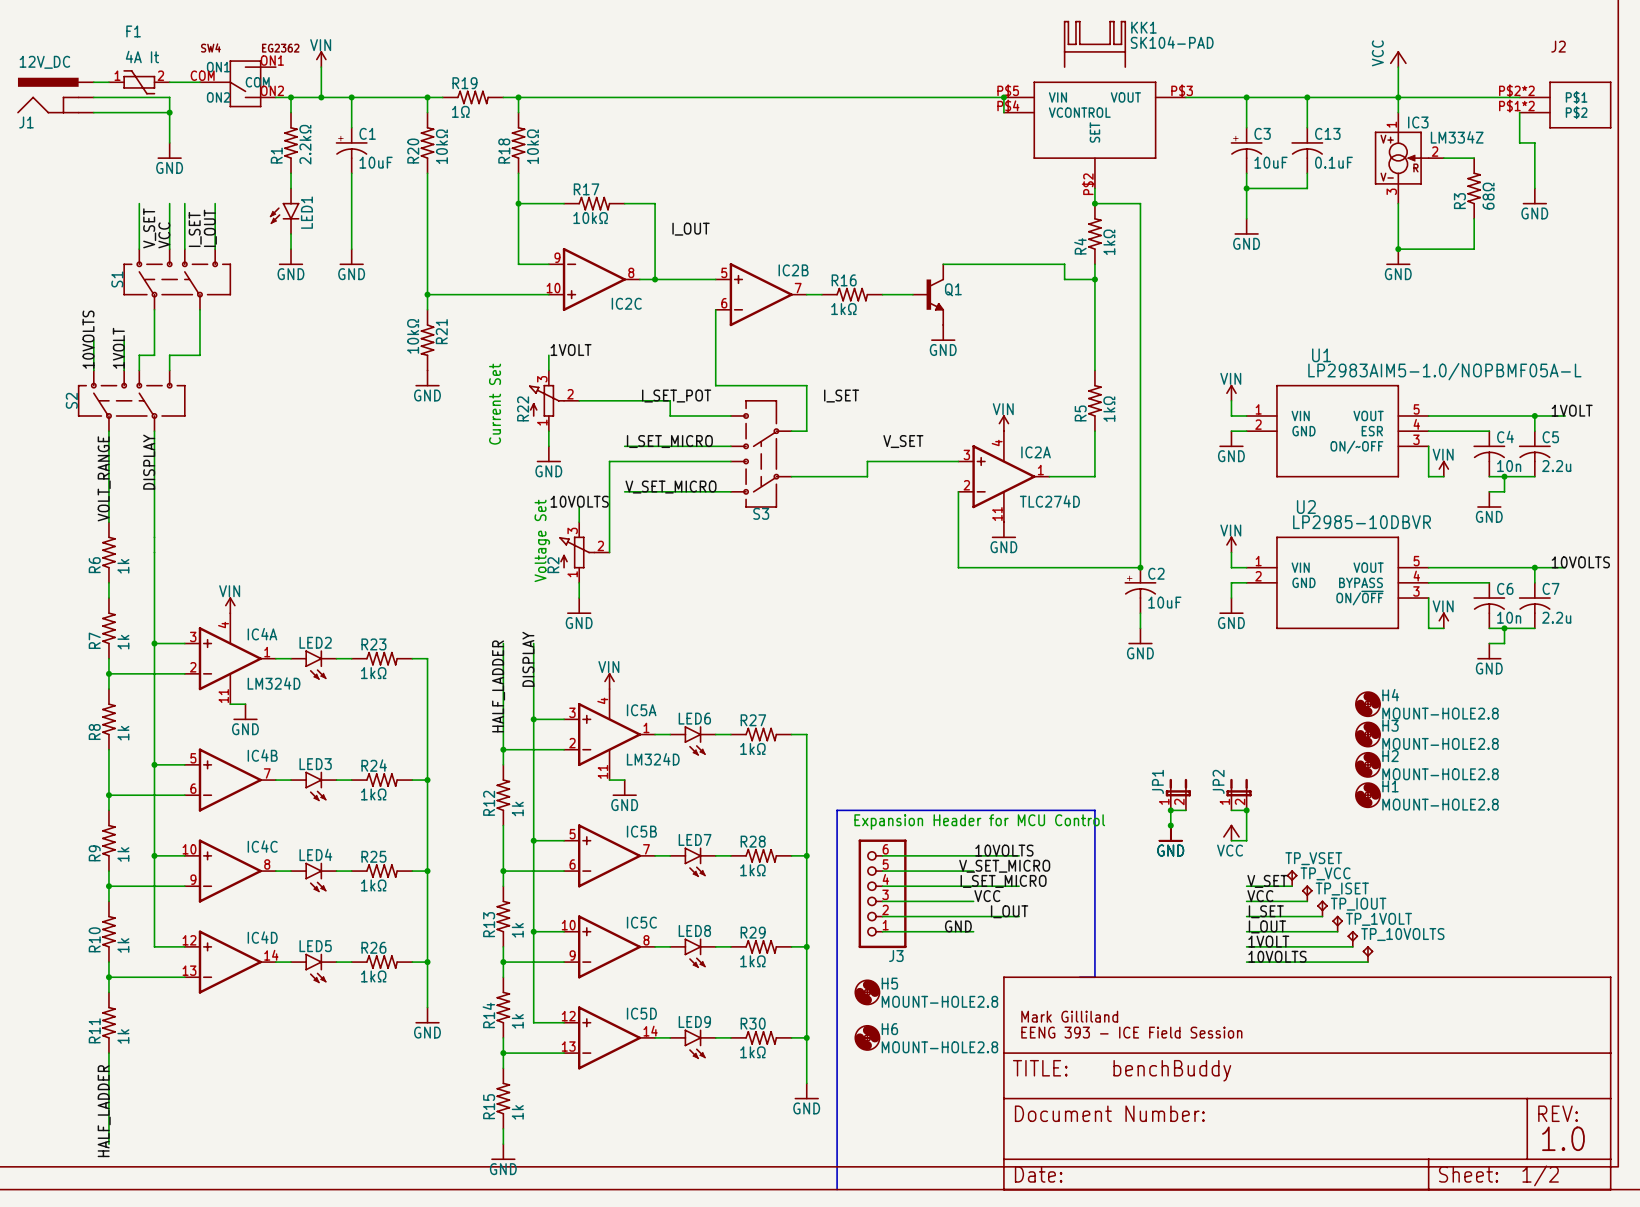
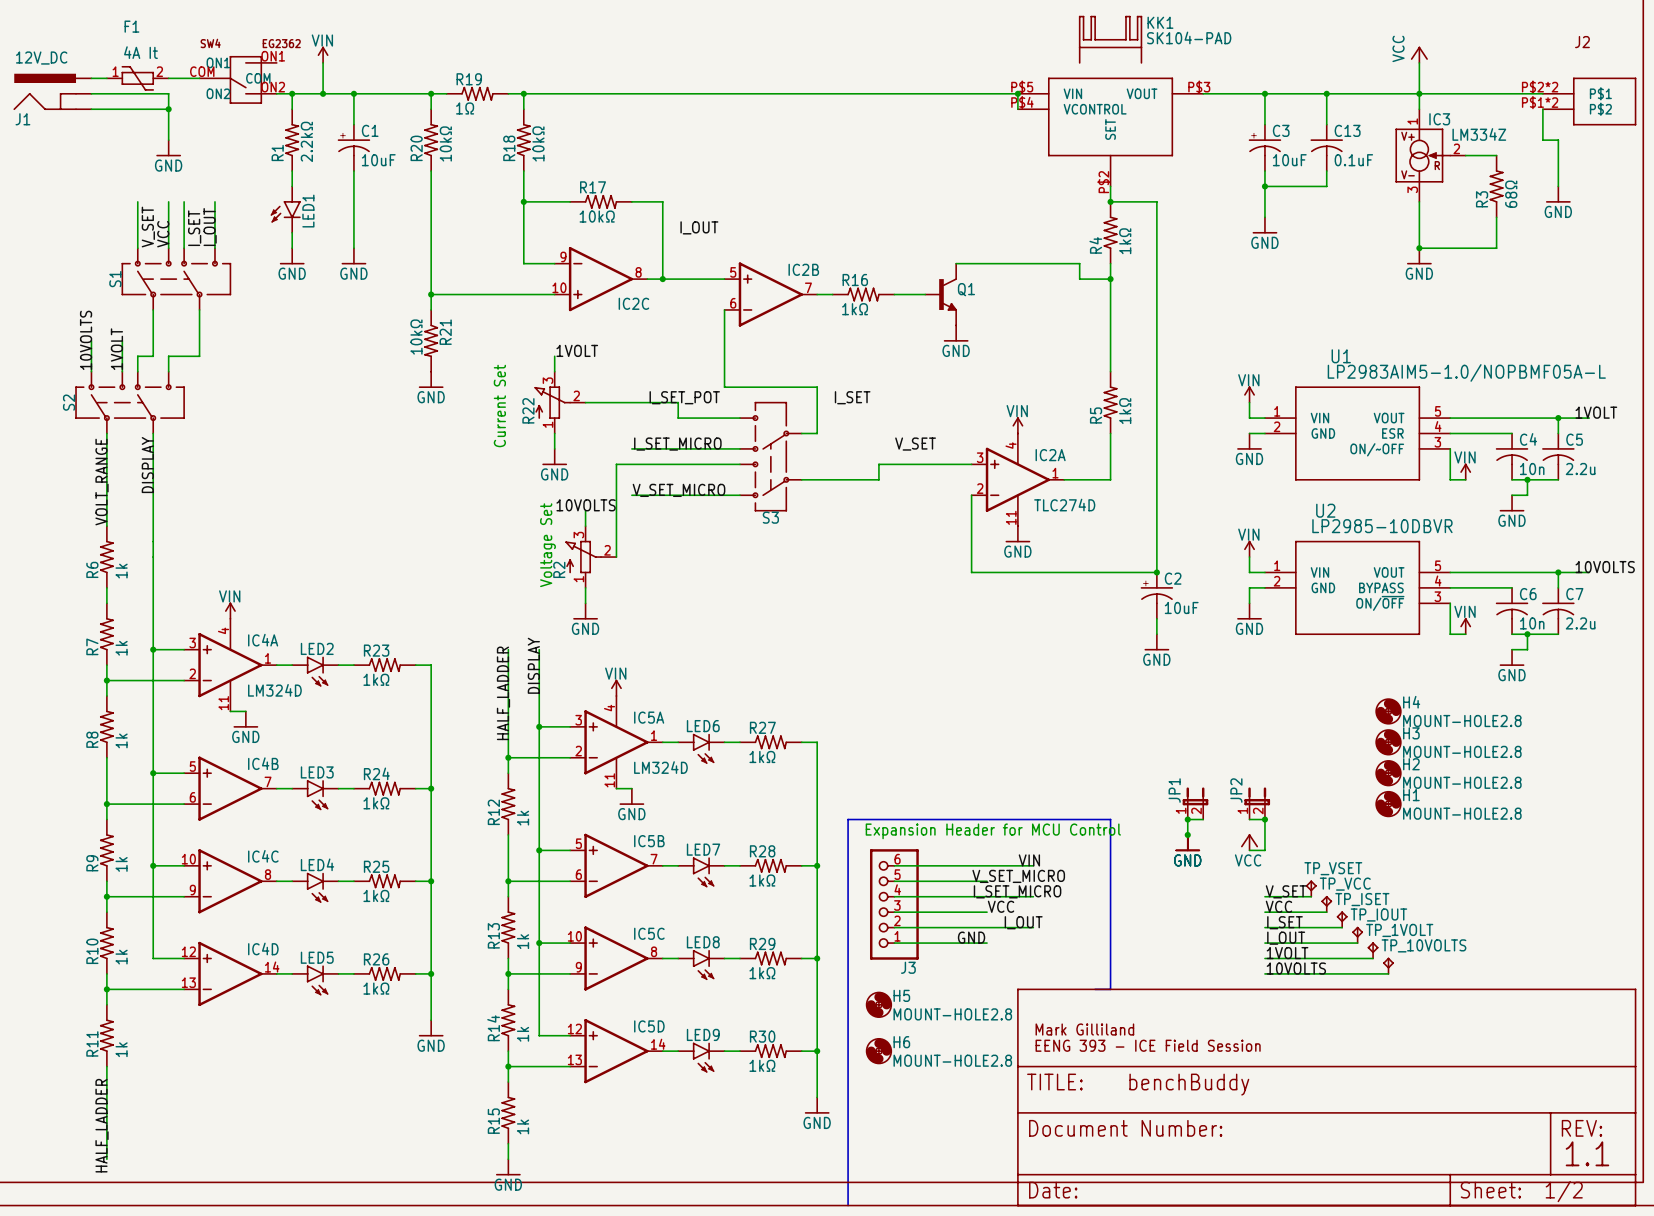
label: 10VOLTS (1004, 850) -> none
label: none -> VIN (1029, 860)
text: 1.0 (1563, 1138) -> 1.1 (1587, 1153)

